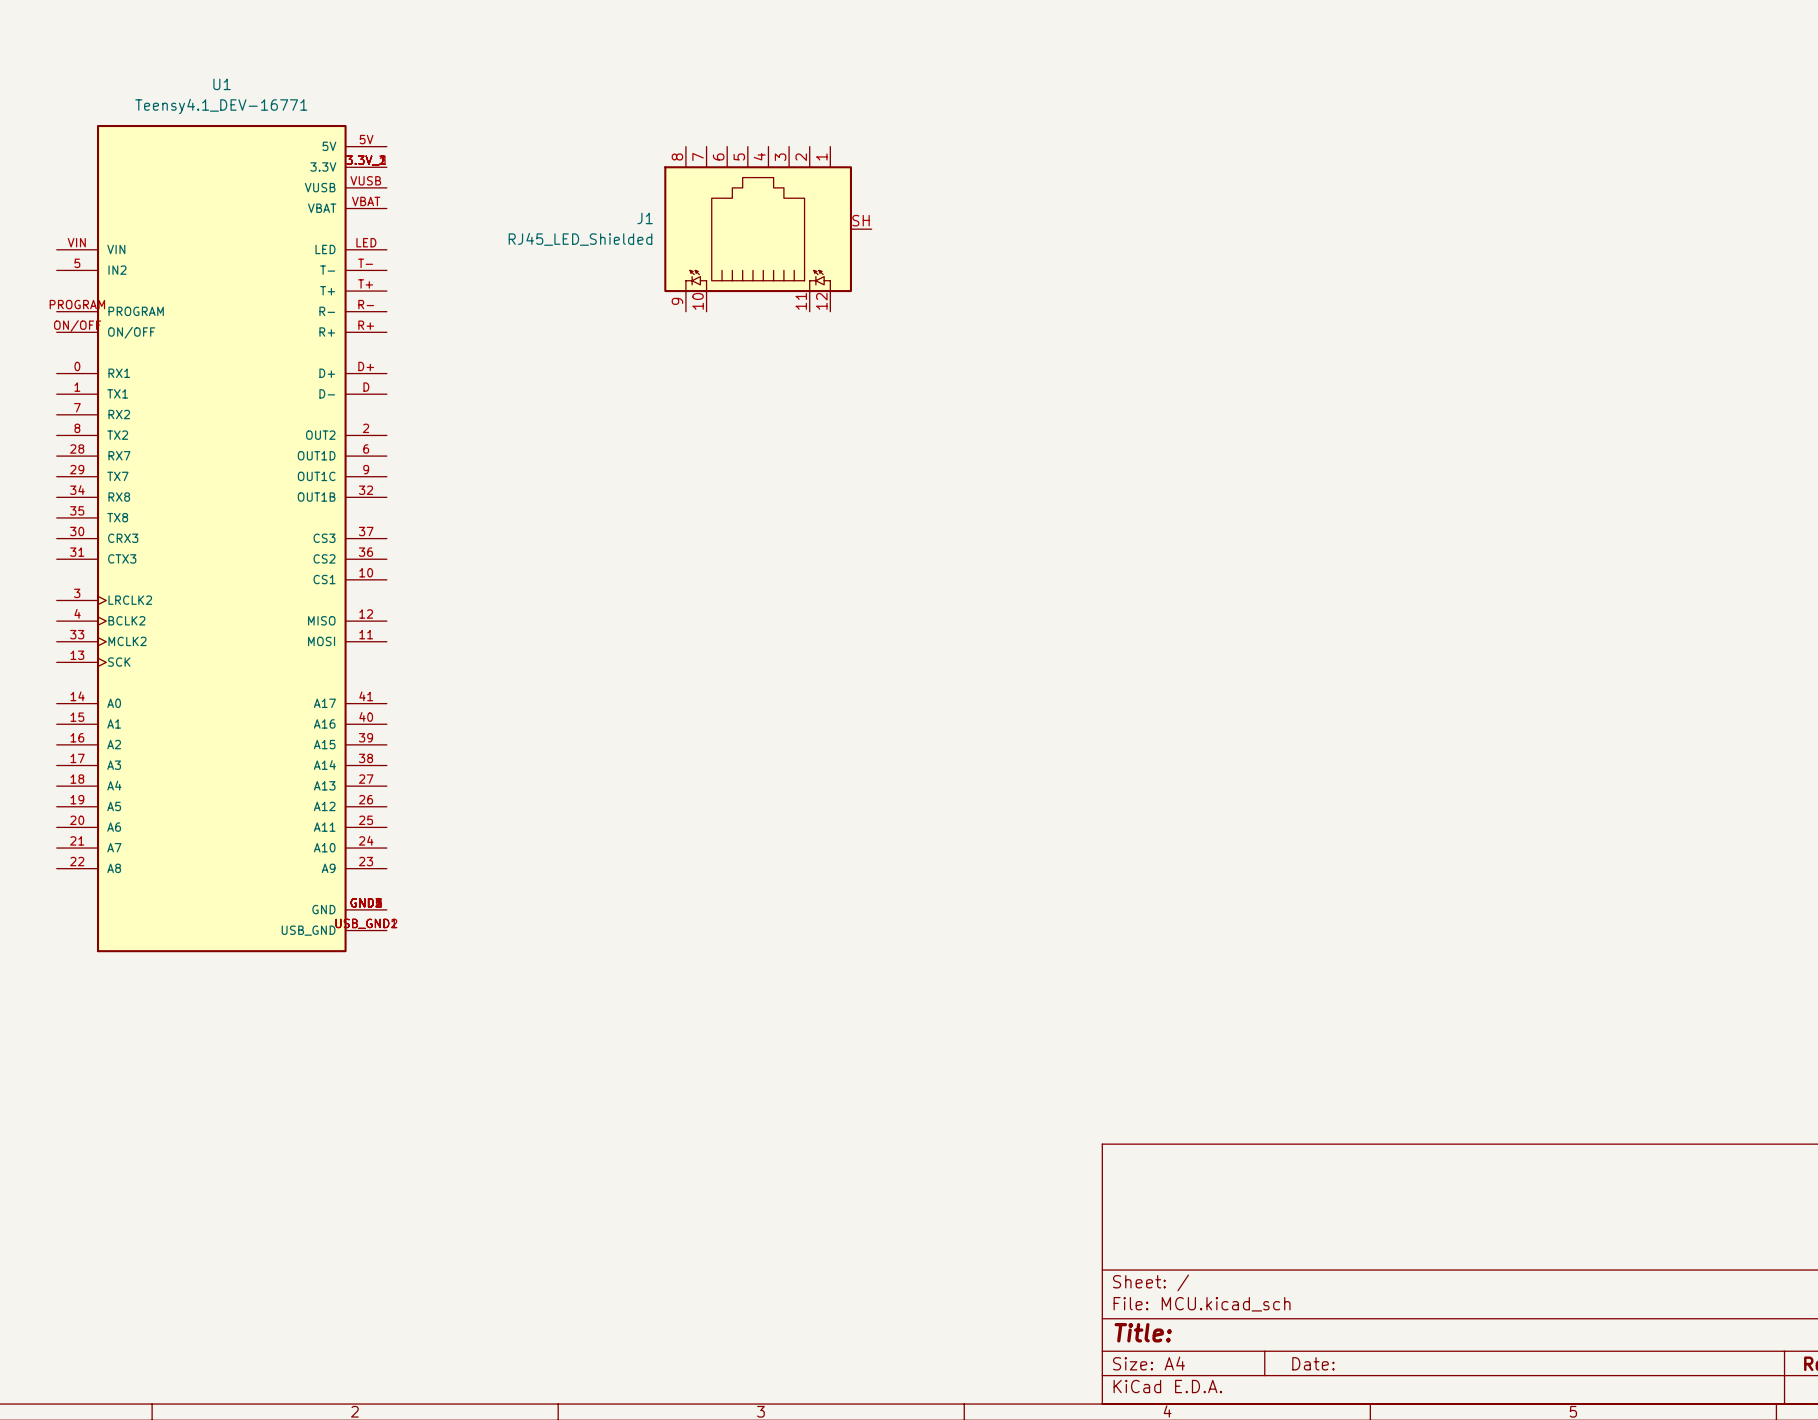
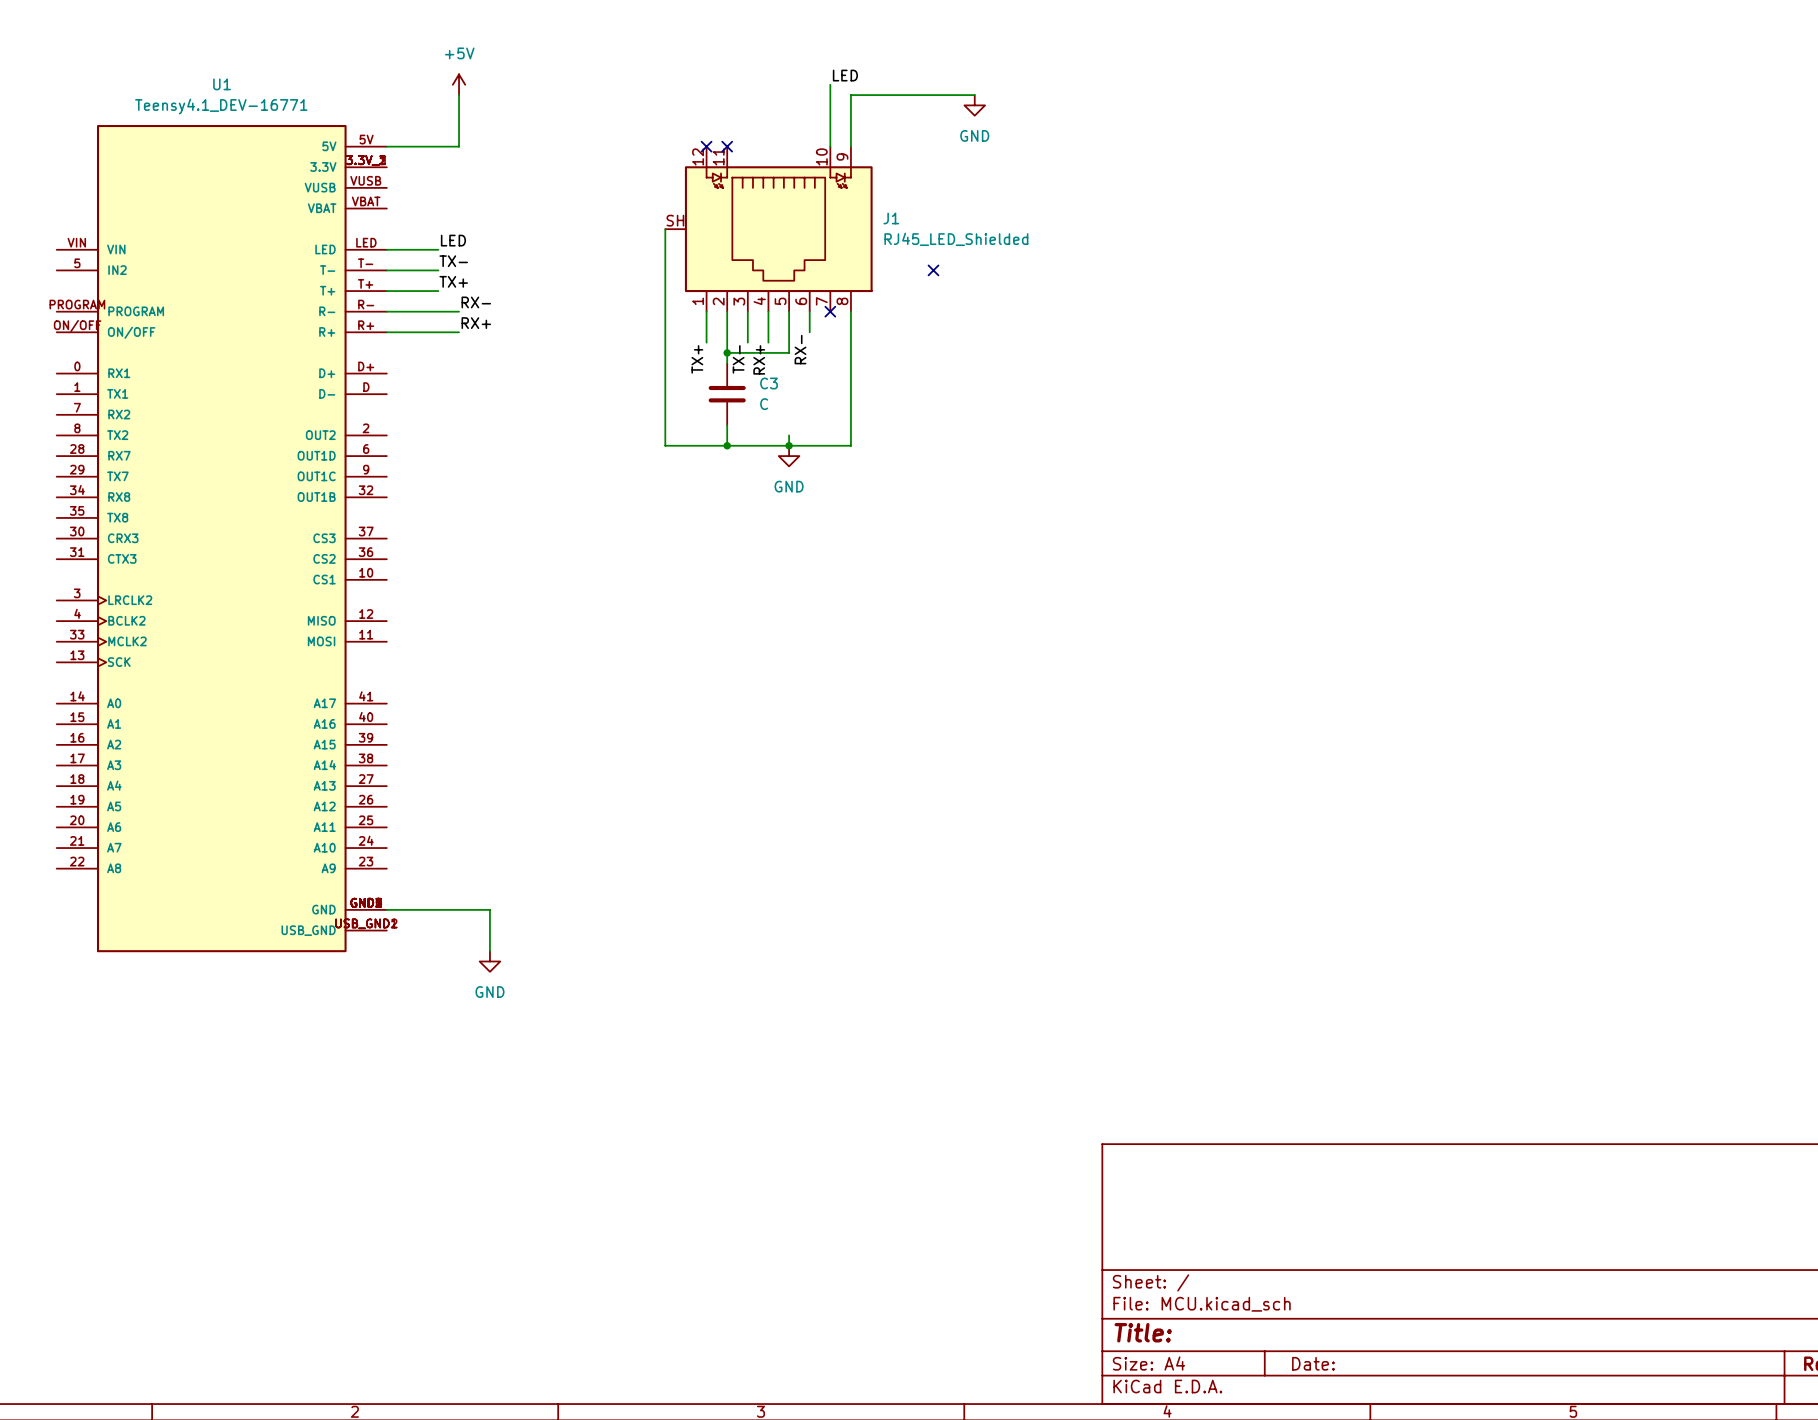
label: none -> LED (845, 75)
power symbol: none -> +5V (459, 84)
wire: none -> (830, 84) (830, 146)
wire: none -> (459, 95) (459, 146) (386, 146)
wire: none -> (974, 95) (850, 95) (850, 146)
power symbol: none -> GND (974, 105)
no-connect mark: none -> (706, 146)
no-connect mark: none -> (727, 146)
J1 name position: J1 (645, 218) -> J1 (891, 218)
wire: none -> (665, 229) (665, 445) (850, 445) (850, 311)
J1 rotation: 0° (758, 229) -> 180° (778, 229)
J1 value position: RJ45_LED_Shielded (580, 239) -> RJ45_LED_Shielded (956, 239)
label: none -> LED (453, 240)
wire: none -> (386, 249) (438, 249)
label: none -> TX- (453, 261)
wire: none -> (386, 270) (438, 270)
no-connect mark: none -> (933, 270)
label: none -> TX+ (453, 281)
wire: none -> (386, 291) (438, 291)
label: none -> RX- (476, 302)
wire: none -> (386, 311) (459, 311)
wire: none -> (706, 311) (706, 342)
wire: none -> (727, 311) (727, 363)
wire: none -> (747, 311) (747, 342)
wire: none -> (768, 311) (768, 342)
wire: none -> (789, 311) (789, 352) (727, 352)
wire: none -> (809, 311) (809, 332)
no-connect mark: none -> (830, 311)
label: none -> RX+ (476, 323)
wire: none -> (386, 332) (459, 332)
label: none -> RX- (800, 349)
junction: none -> (727, 352)
label: none -> TX+ (697, 359)
label: none -> TX- (738, 359)
label: none -> RX+ (759, 359)
C3: none -> C (727, 394)
wire: none -> (727, 425) (727, 445)
wire: none -> (789, 435) (789, 445)
junction: none -> (727, 445)
junction: none -> (789, 445)
power symbol: none -> GND (789, 456)
wire: none -> (386, 909) (489, 909) (489, 951)
power symbol: none -> GND (489, 961)

